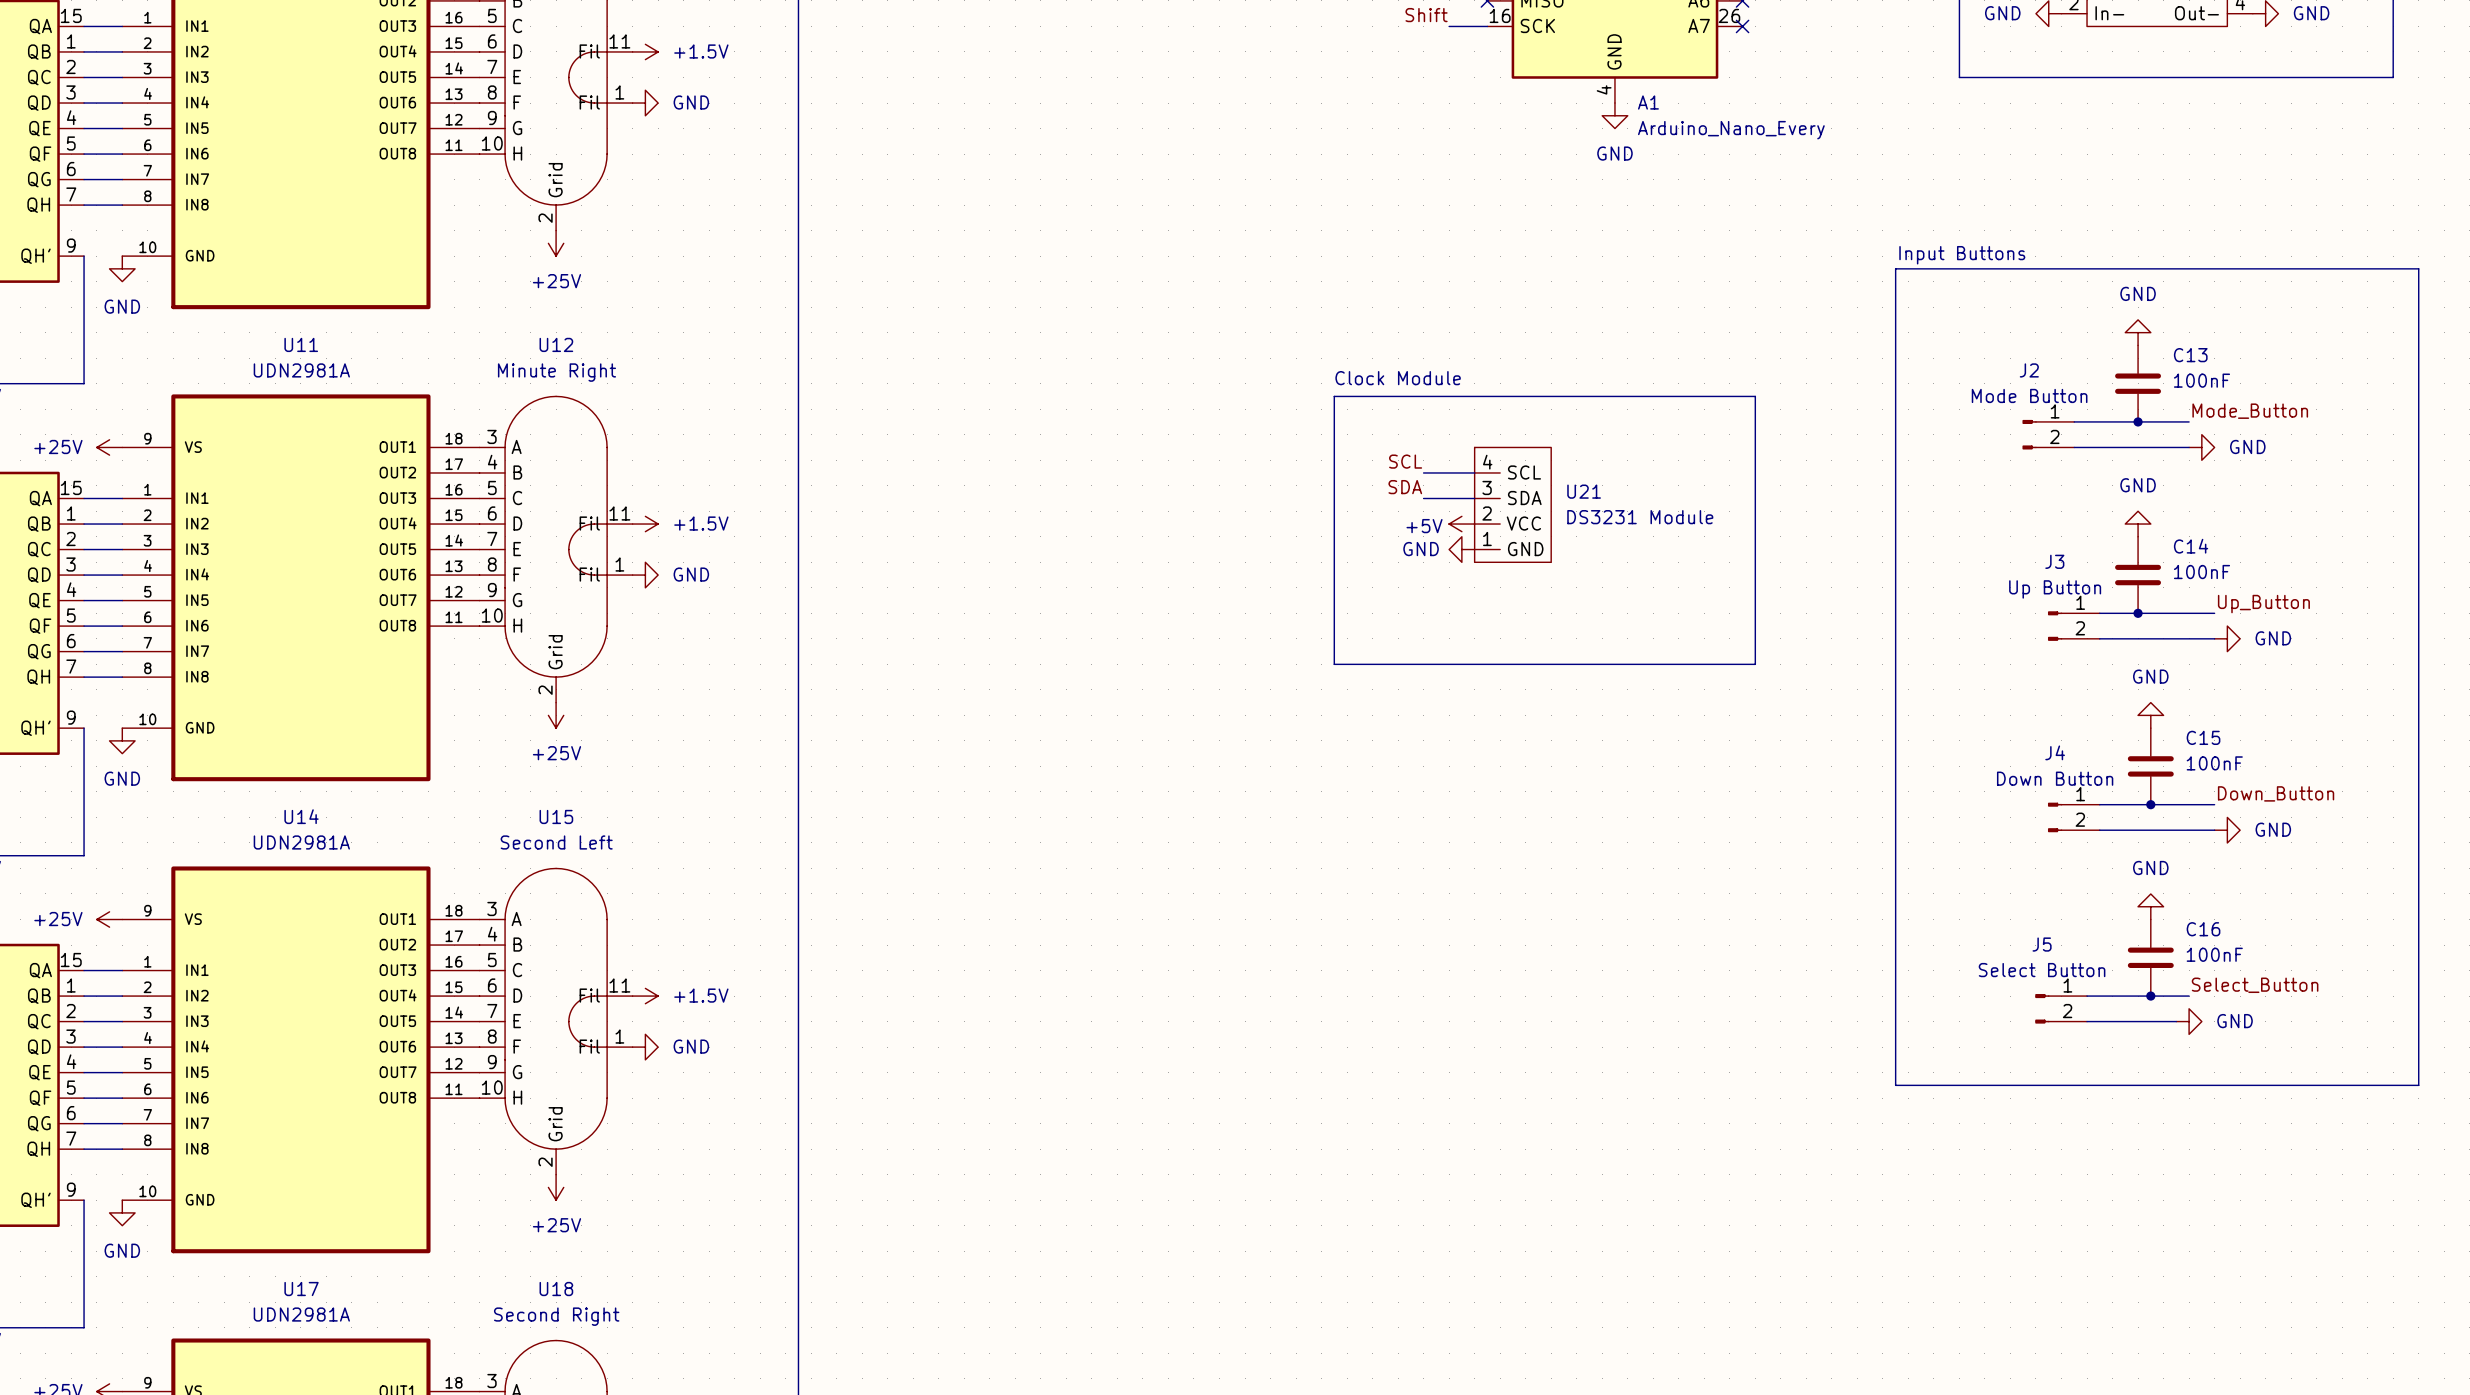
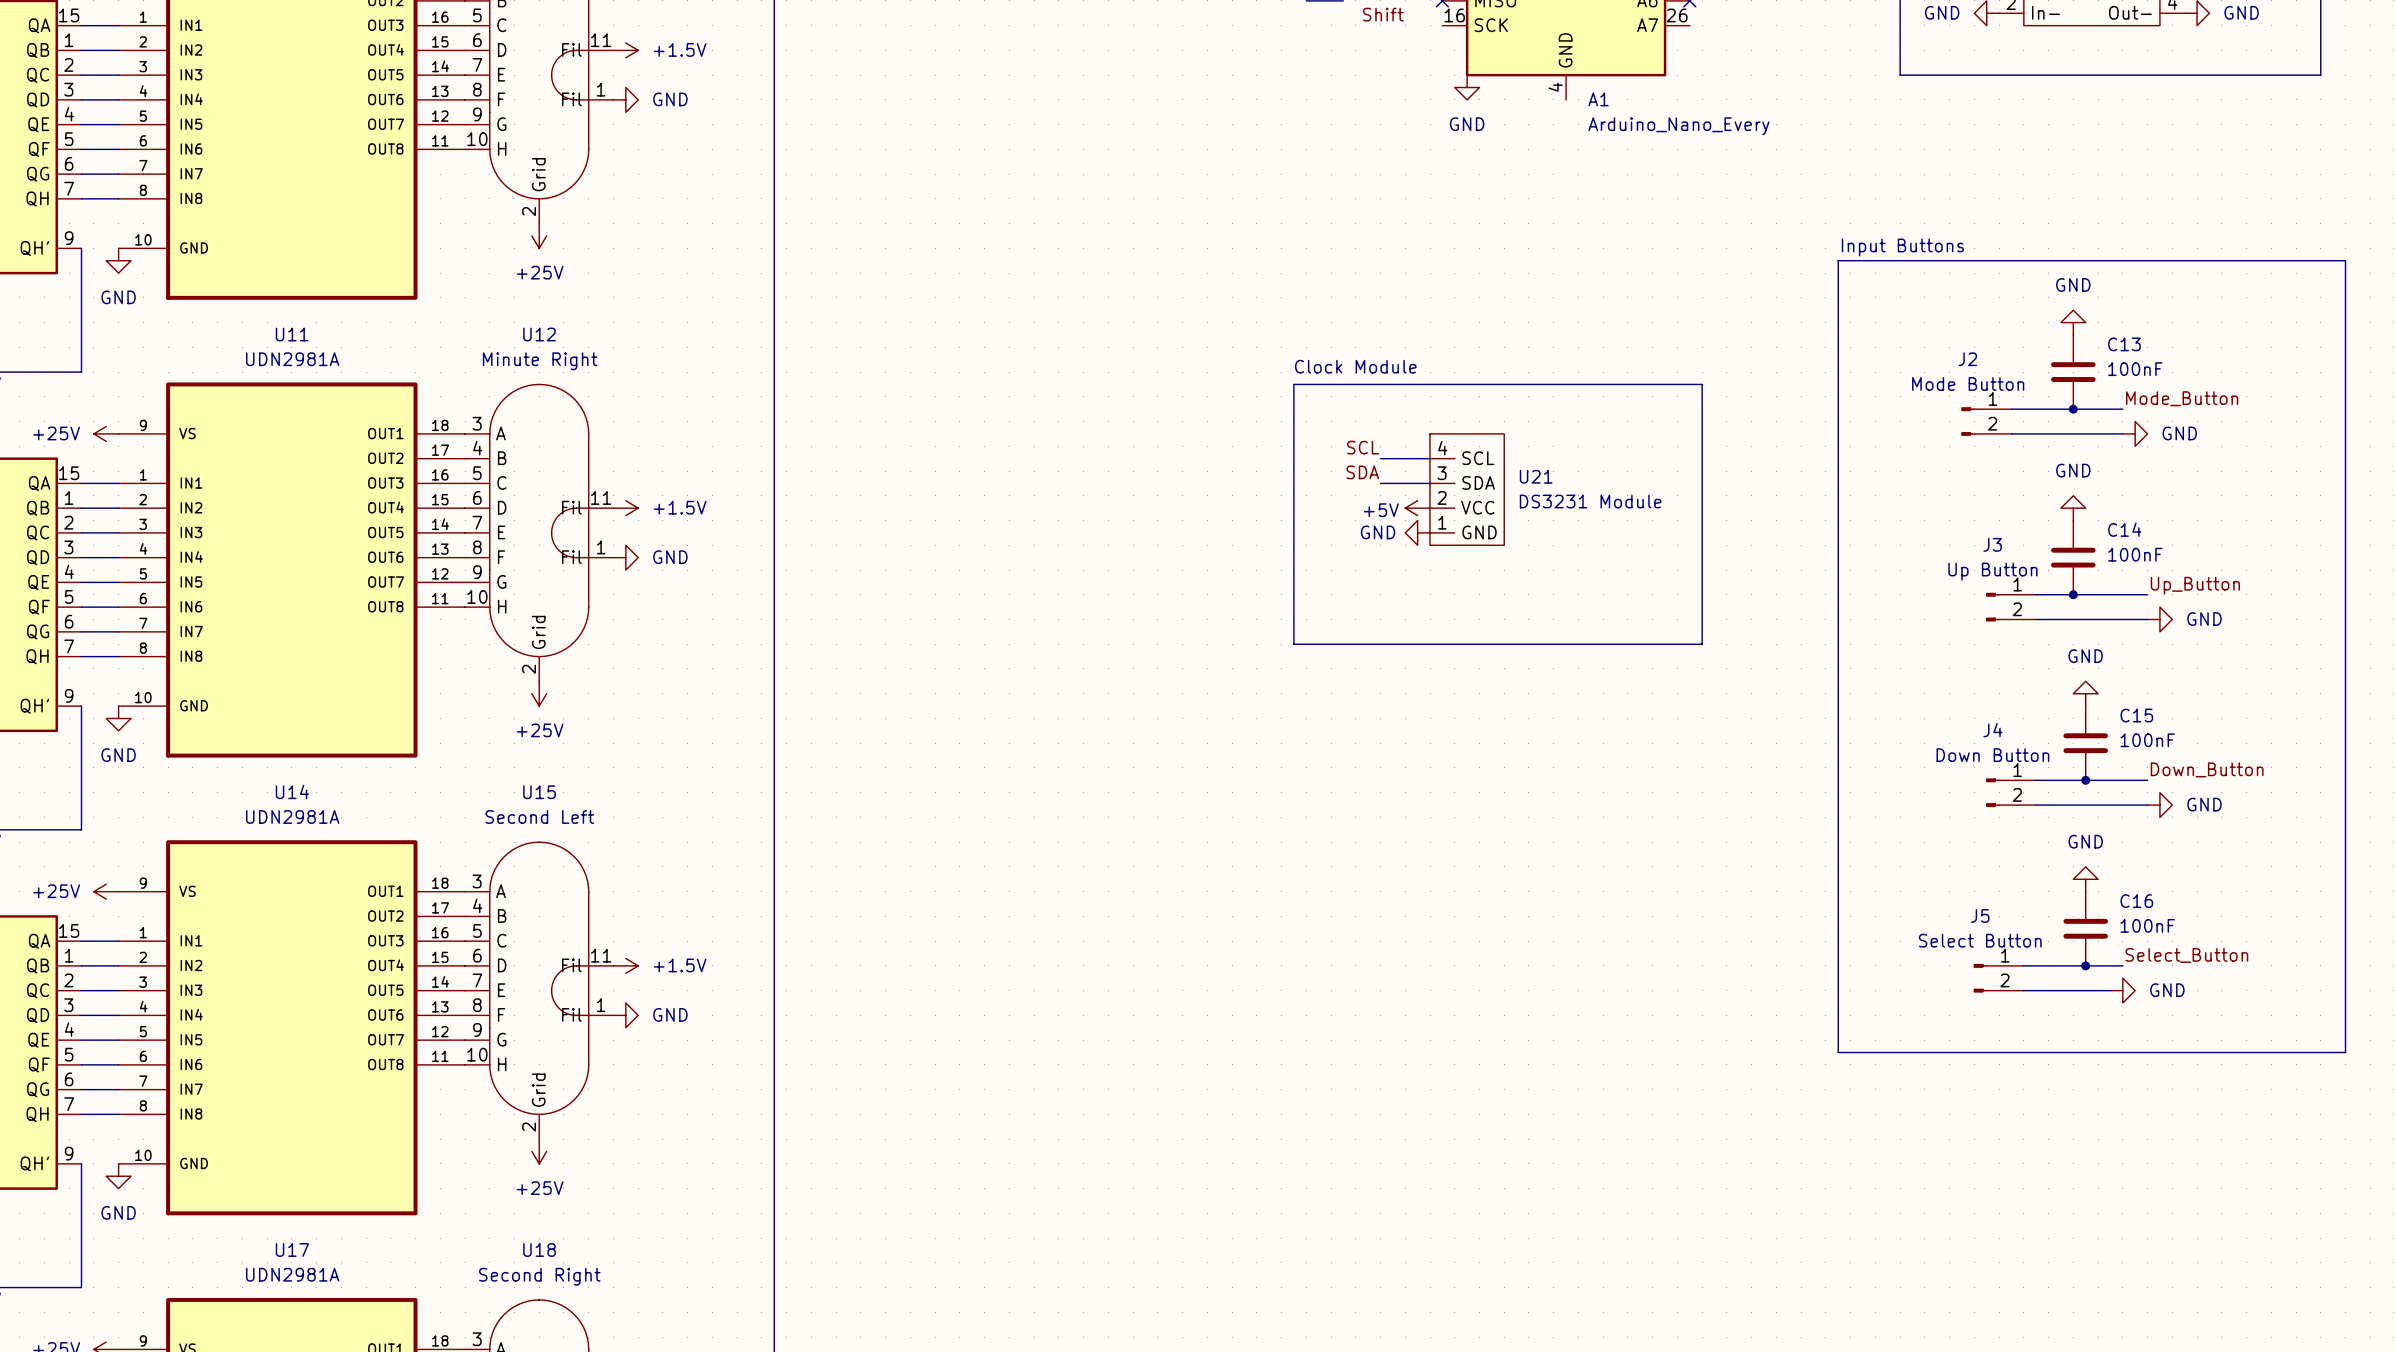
wire: (1449, 26) (1487, 26) -> (1306, 0) (1343, 0)
no-connect mark: (1742, 26) -> none
power symbol position: GND (1614, 115) -> GND (1467, 87)

